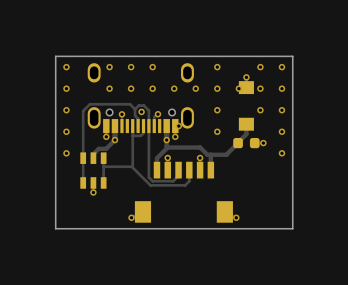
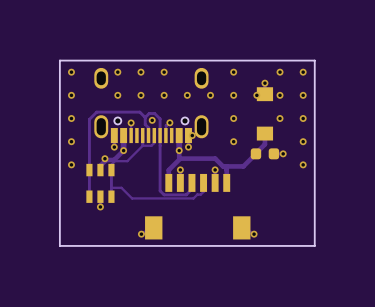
track: (143, 132) (140, 135) (132, 135) -> (154, 142) (151, 145) (142, 145) (127, 161) (114, 161) (111, 164) (111, 170)
track: (132, 135) (132, 167) (150, 185) (185, 185) (189, 178) -> (111, 187) (121, 187) (132, 198) (193, 198) (203, 191)
via: none -> (104, 158)
track: (103, 166) (132, 166) -> none

